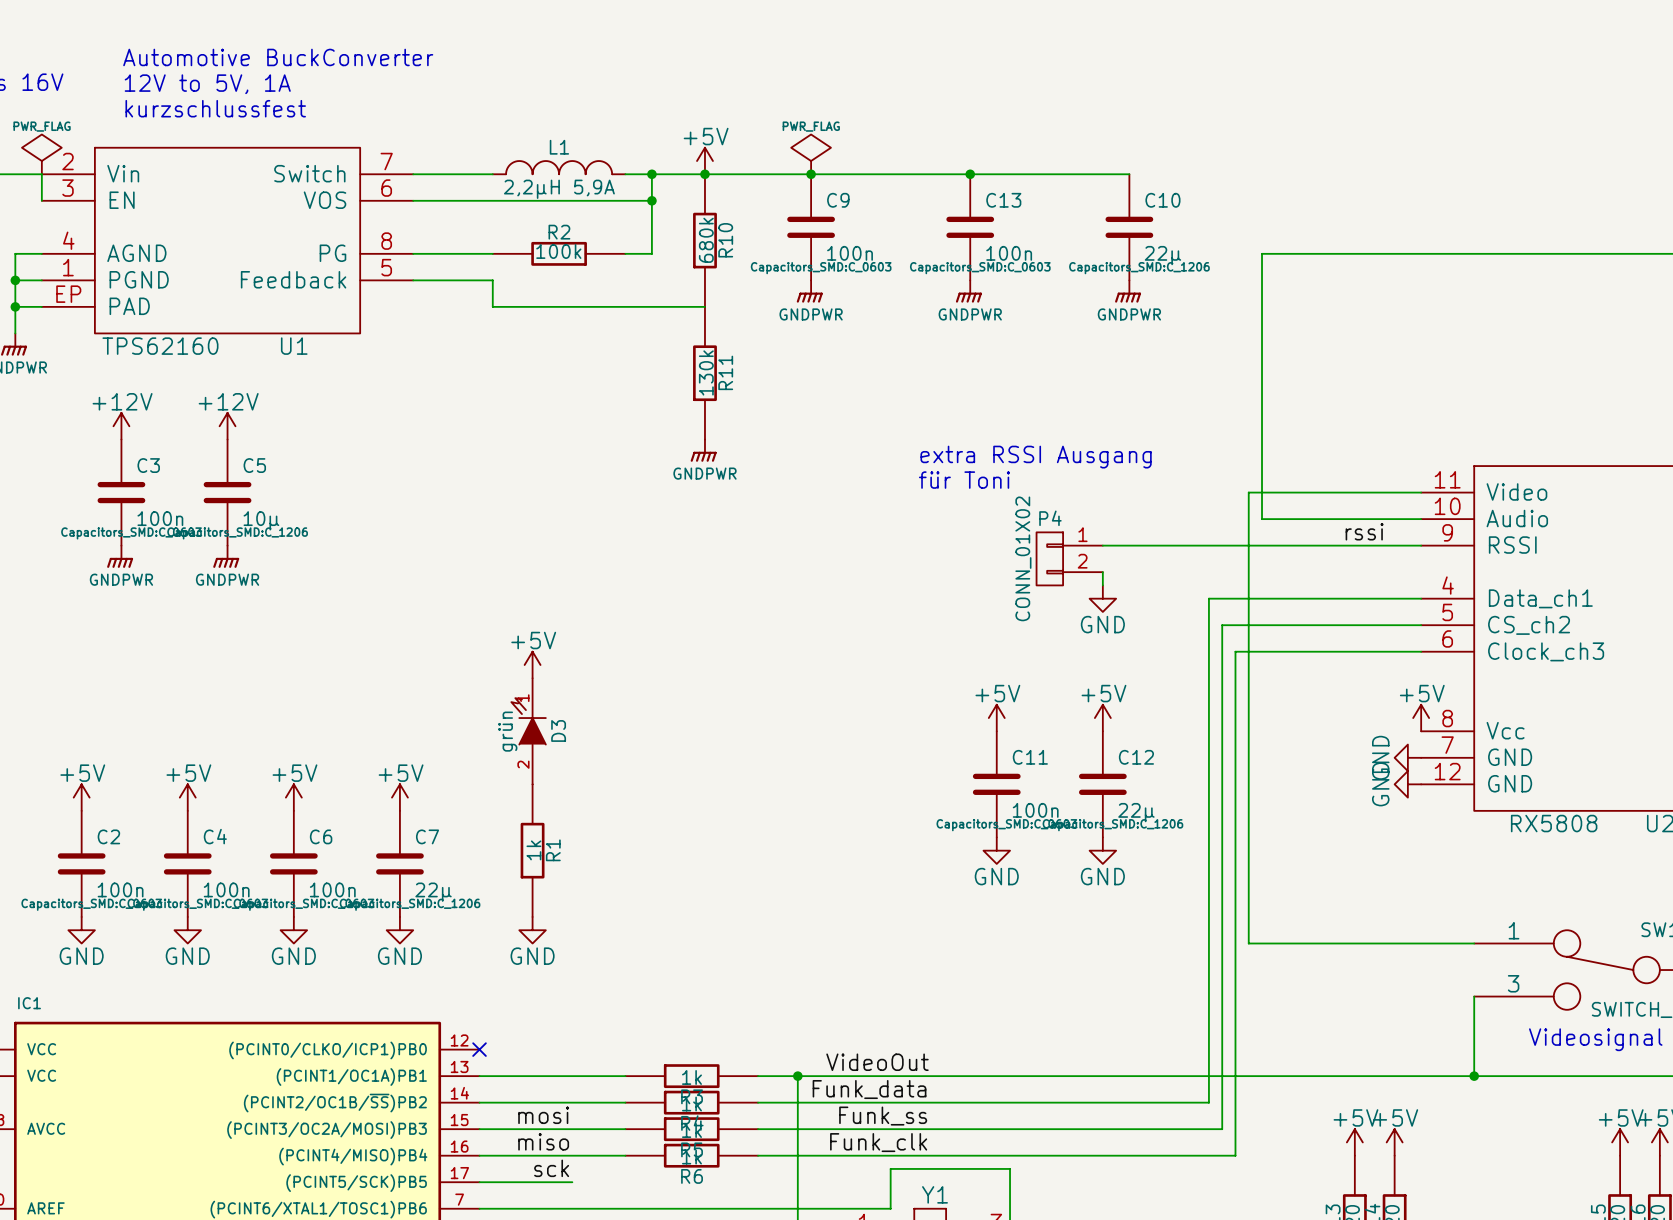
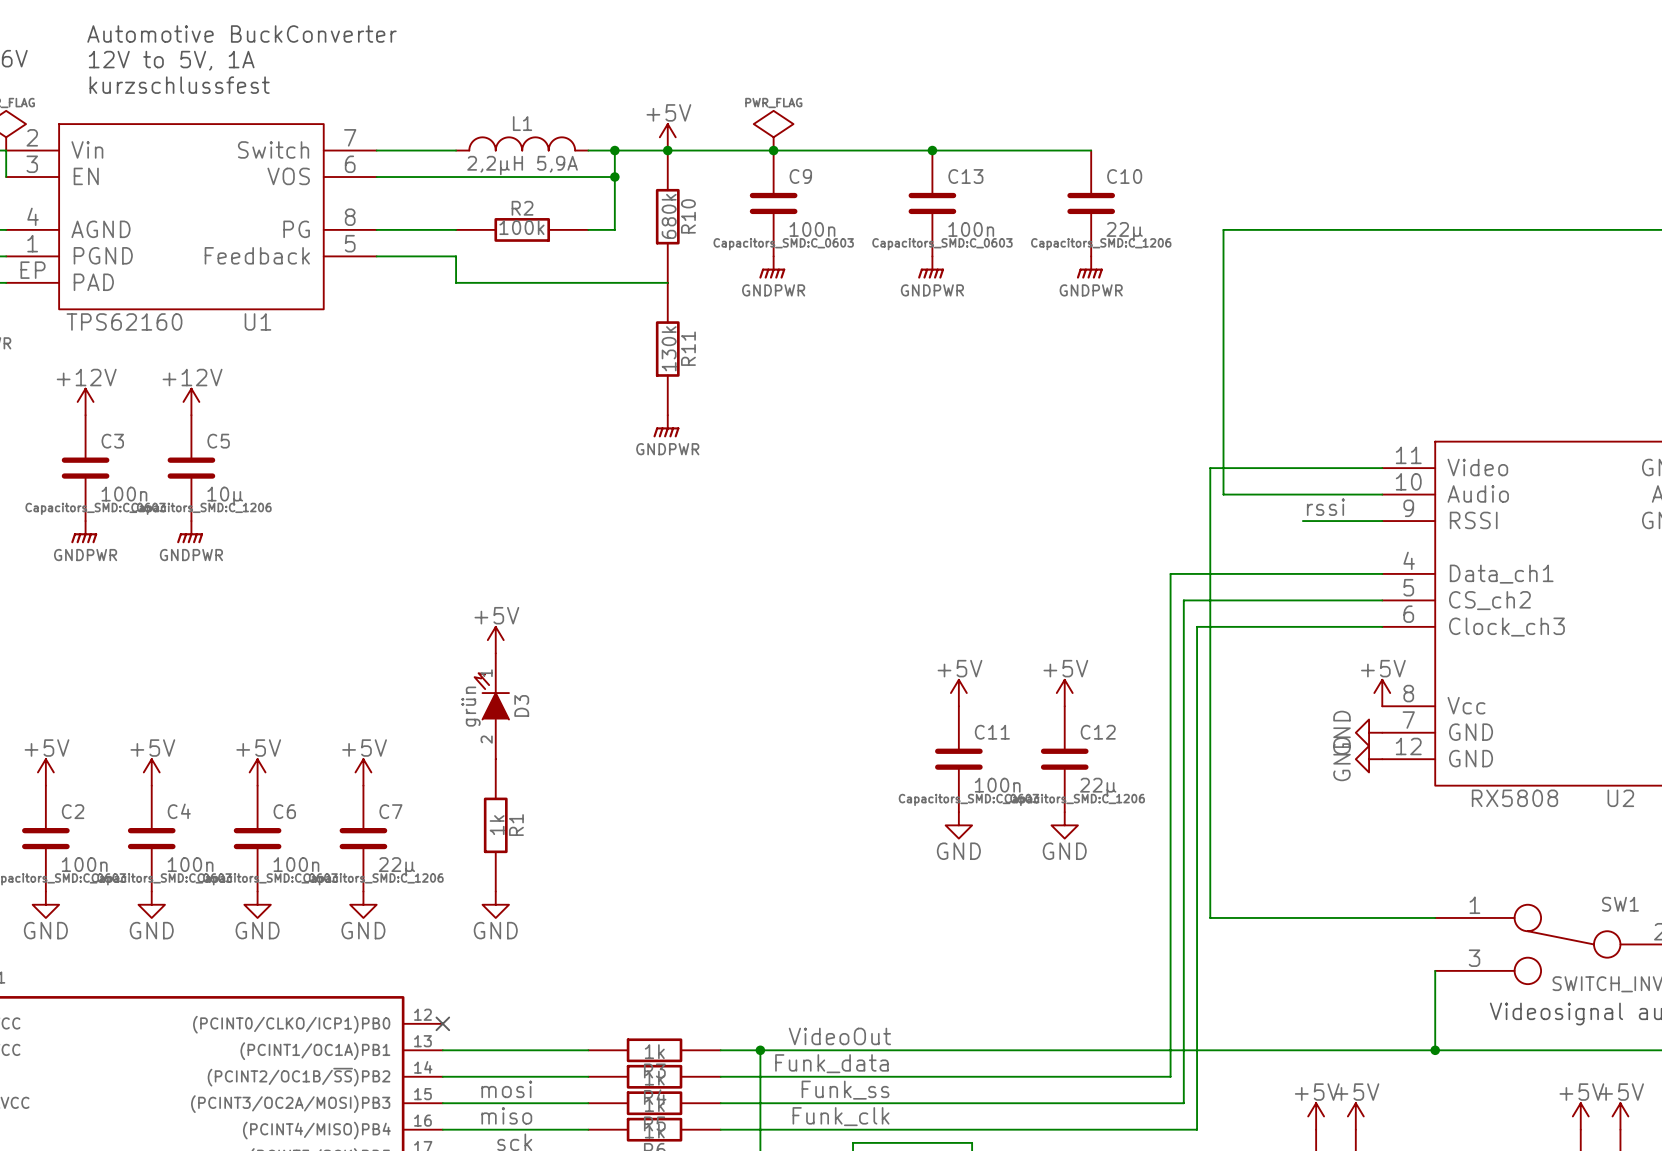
text: extra RSSI Ausgang (1036, 457) -> none
text: für Toni (964, 480) -> none
wire: (1102, 545) (1341, 545) -> none
P4: CONN_01X02 (1069, 558) -> none
wire: (1102, 572) (1102, 585) -> none
power symbol: GND (1102, 598) -> none

